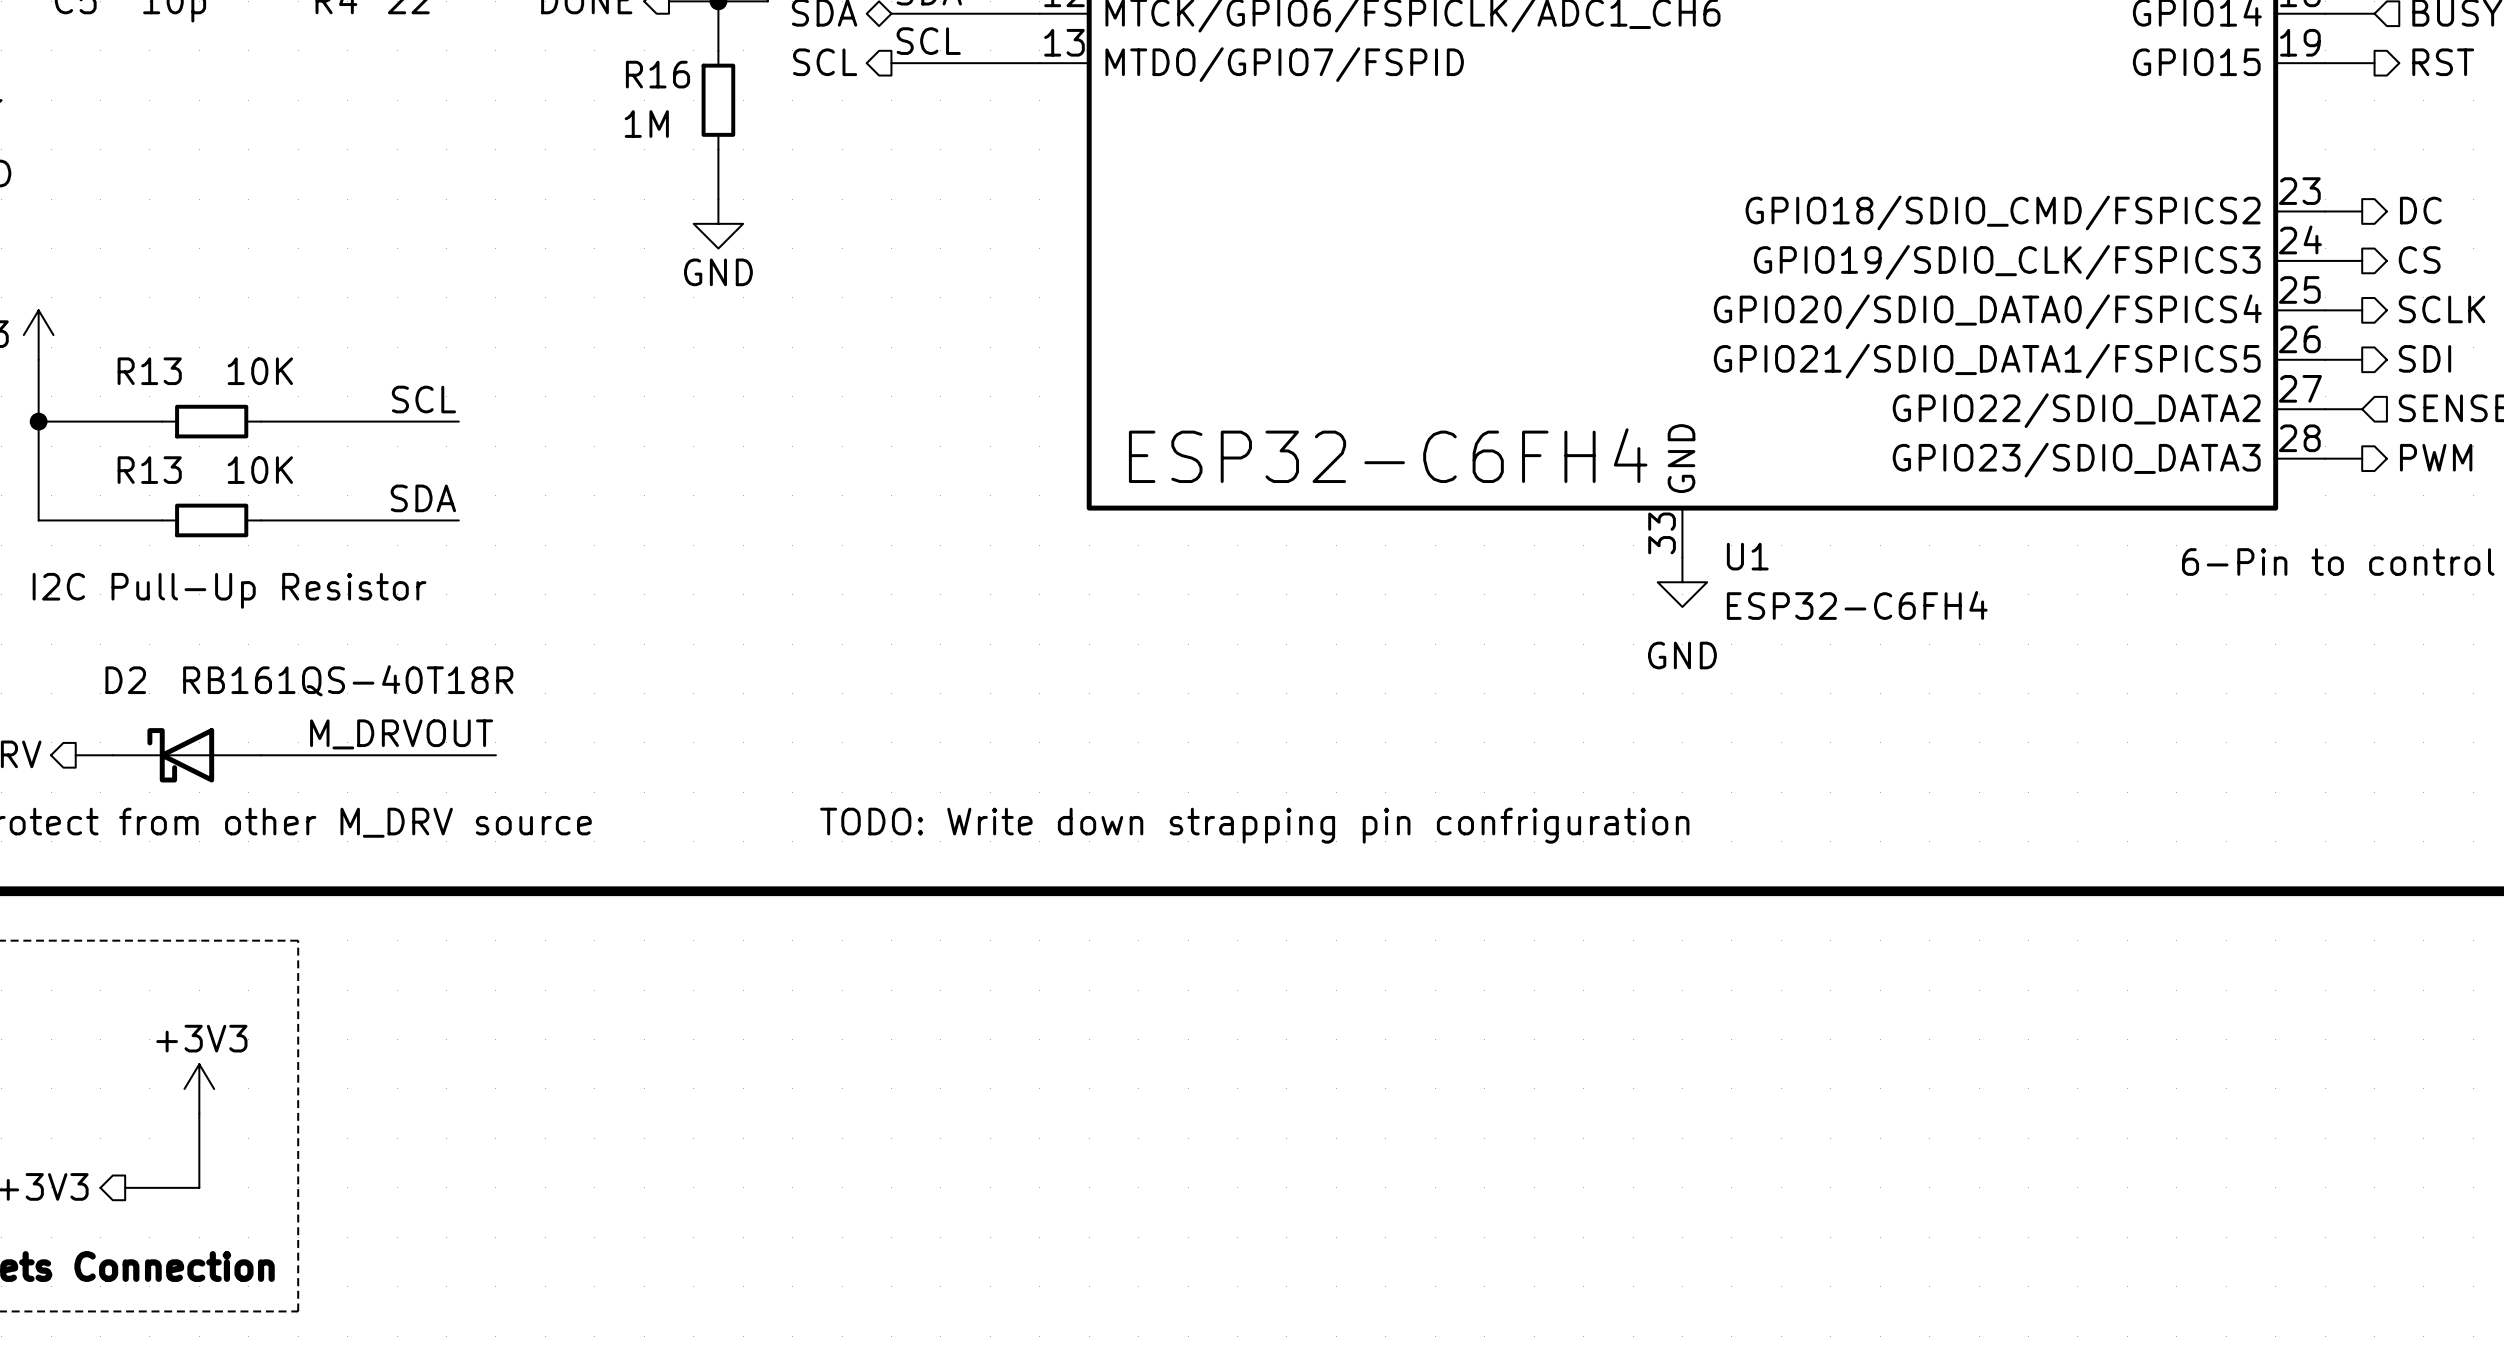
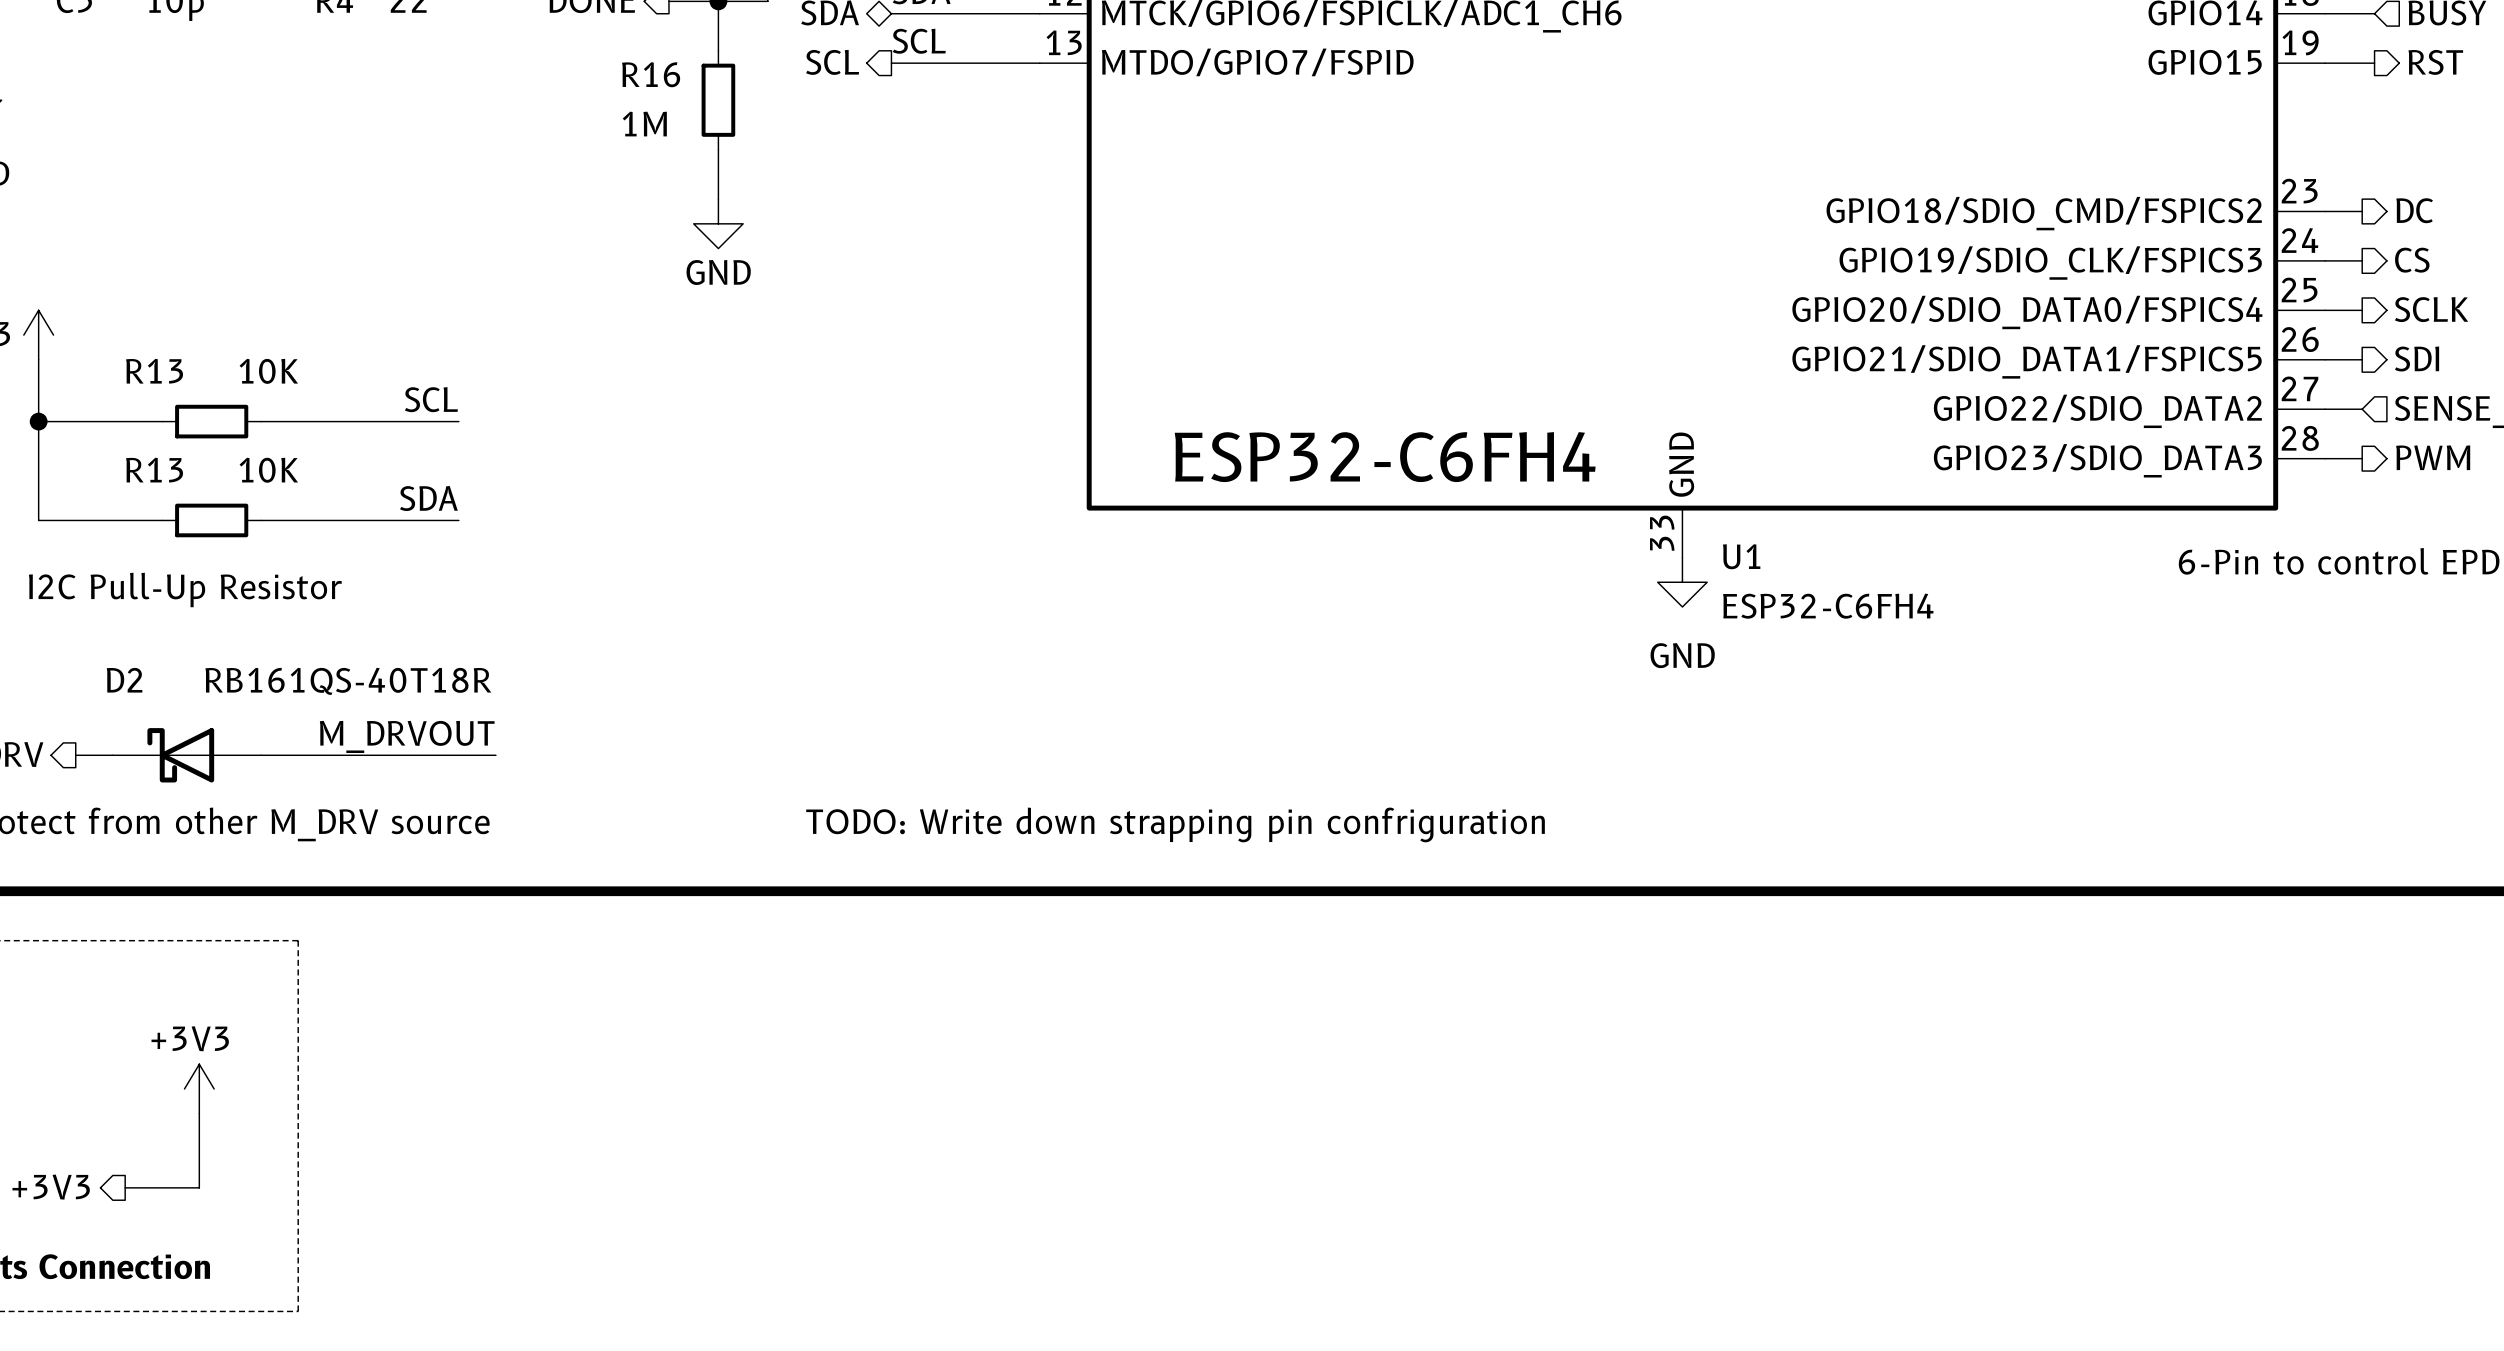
text position: TODO: Write down strapping pin confriguration (1254, 825) -> TODO: Write down strapping pin confriguration (1175, 824)

